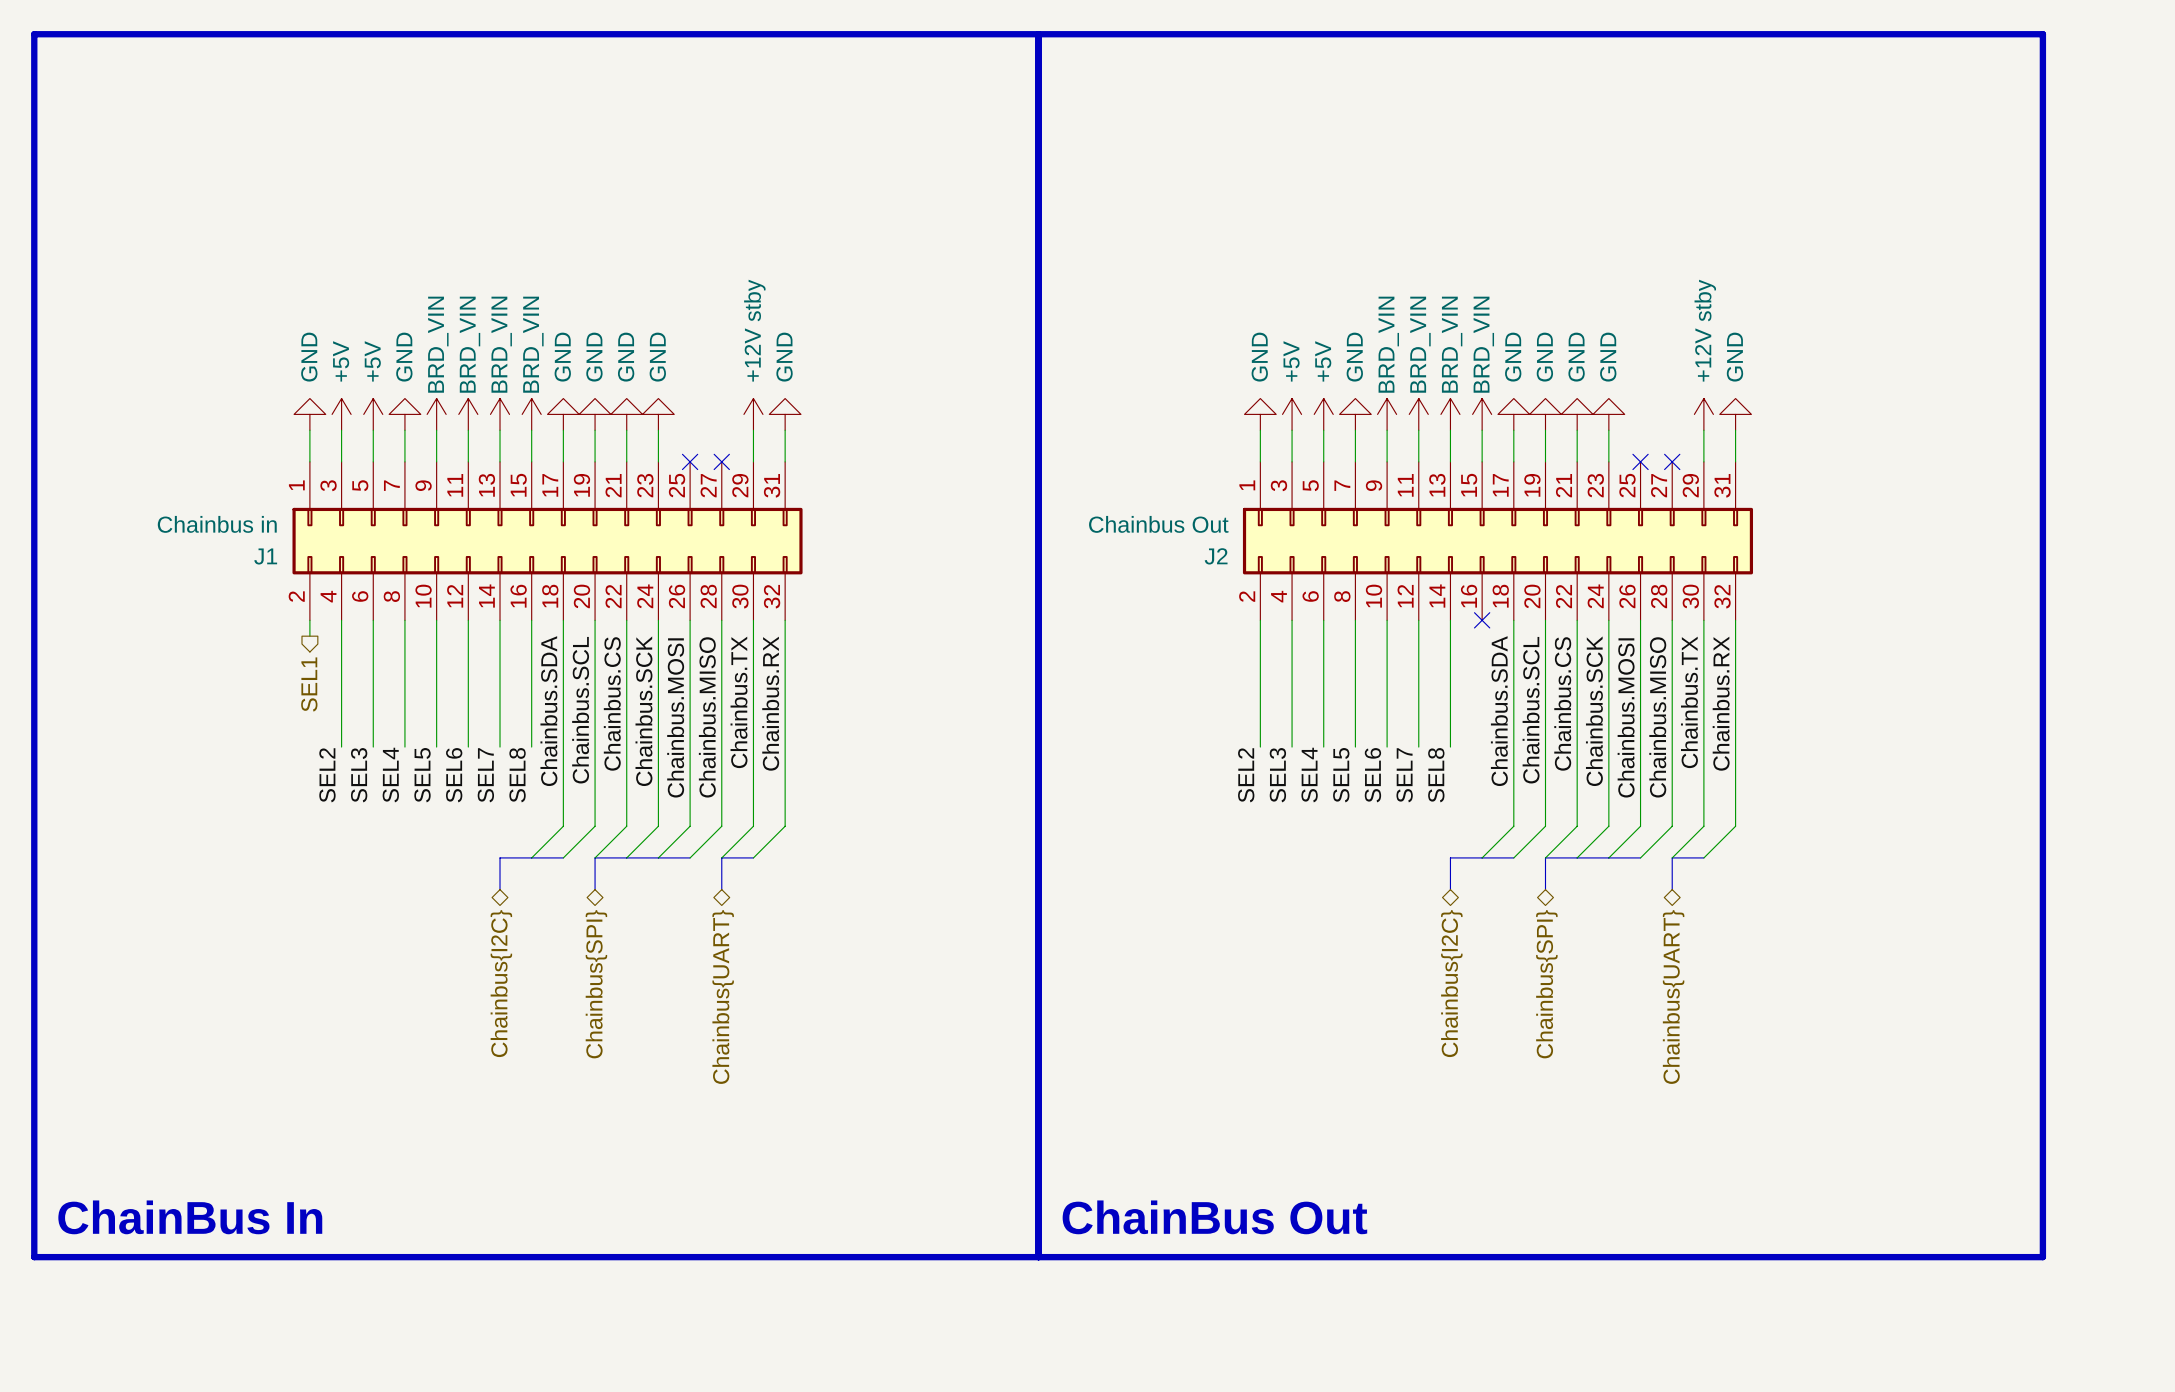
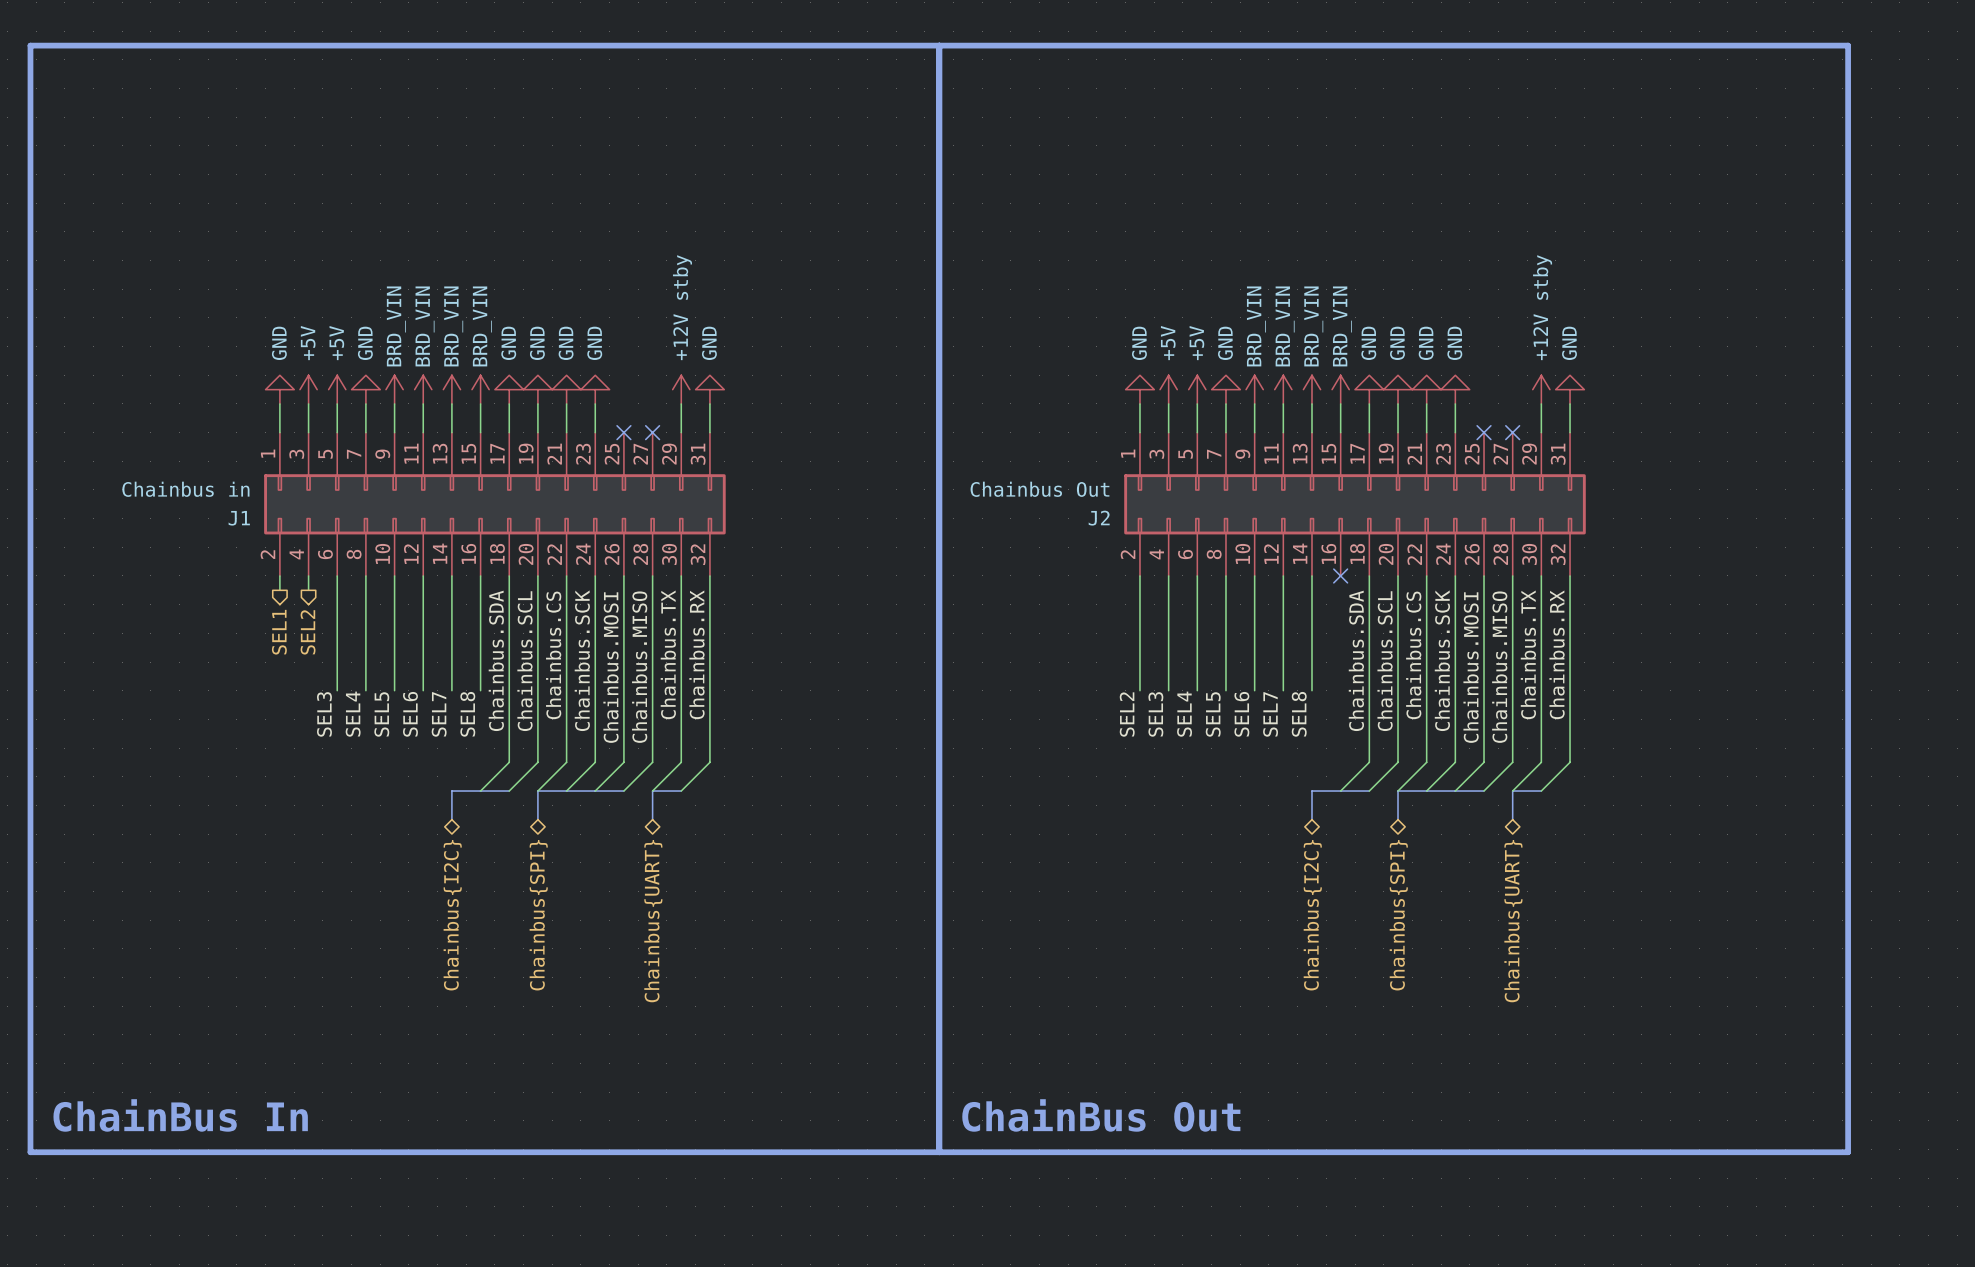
wire: (341, 636) (341, 747) -> none
hierarchical label: none -> SEL2 (308, 632)
label: SEL2 (327, 775) -> none

